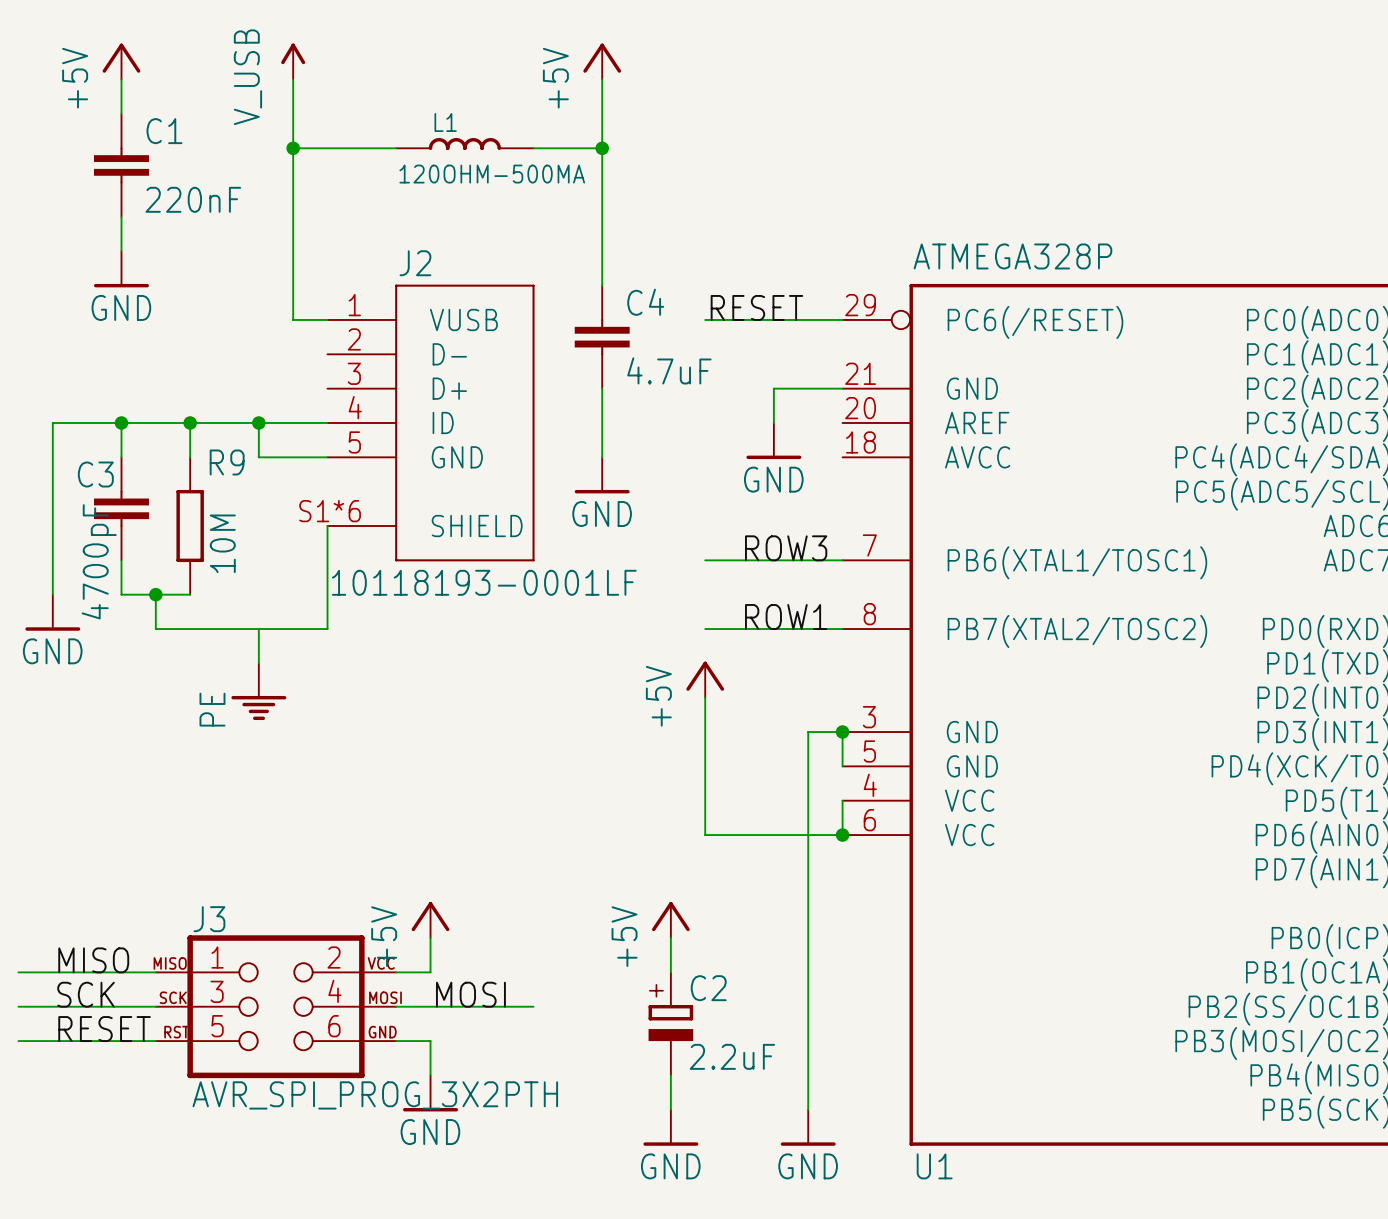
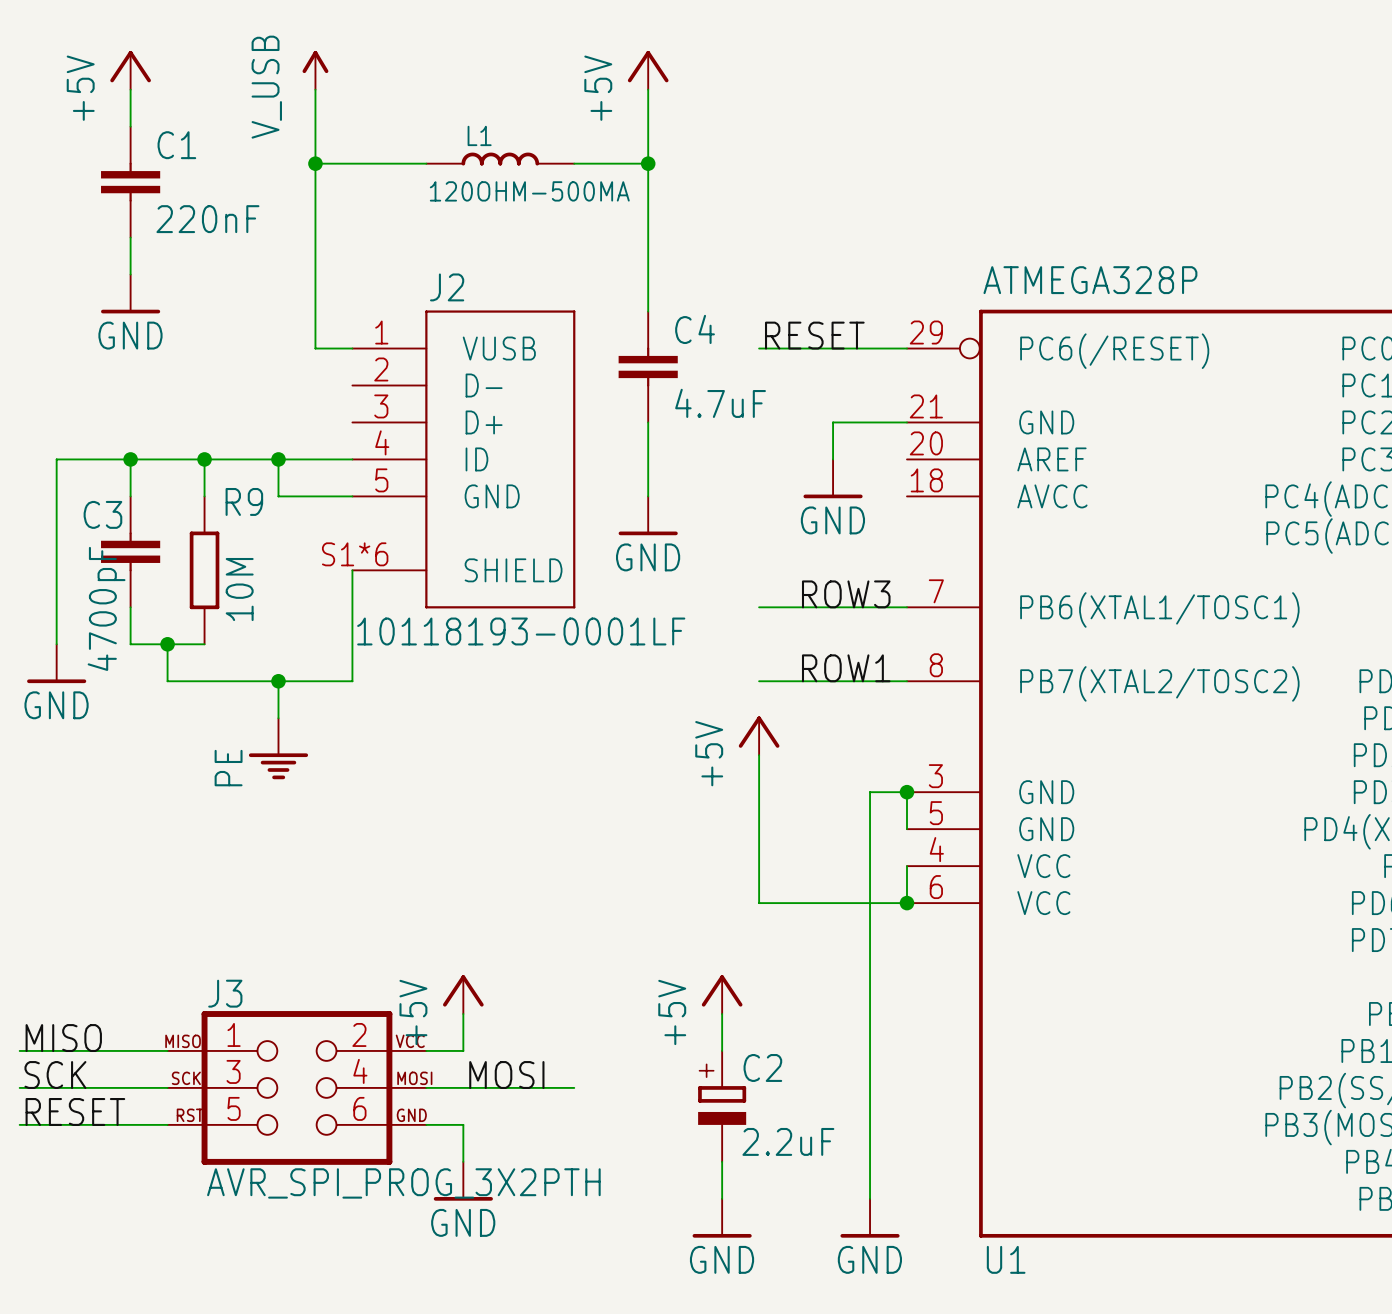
junction: none -> (278, 681)
label position: MISO (93, 960) -> MISO (63, 1038)
label position: SCK (86, 994) -> SCK (55, 1075)
label position: RESET (104, 1029) -> RESET (75, 1111)

